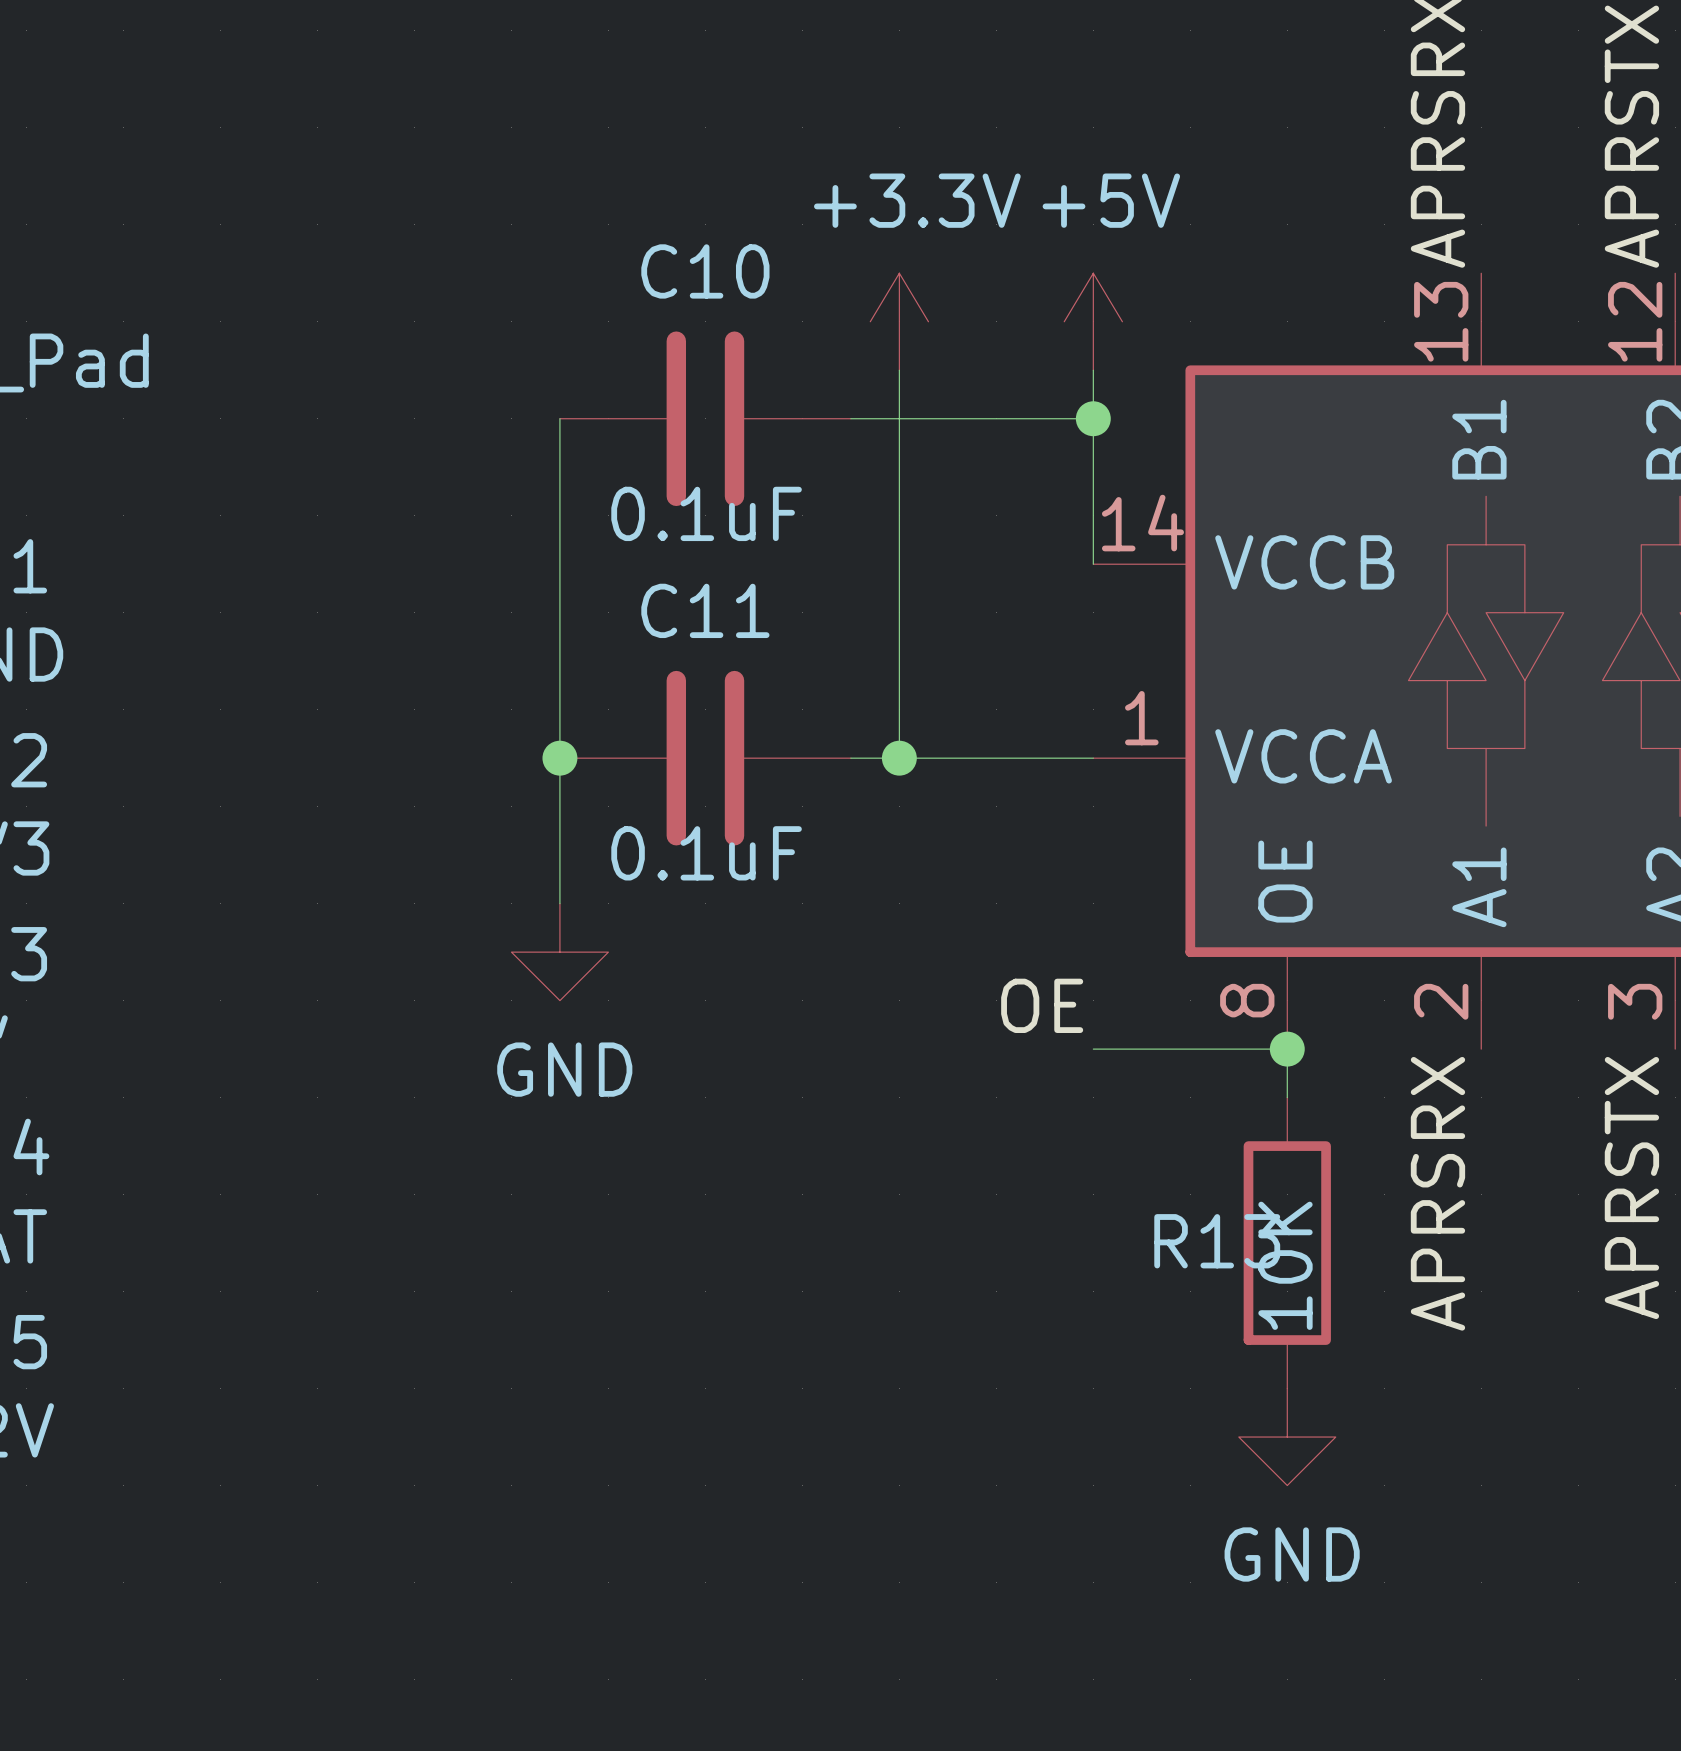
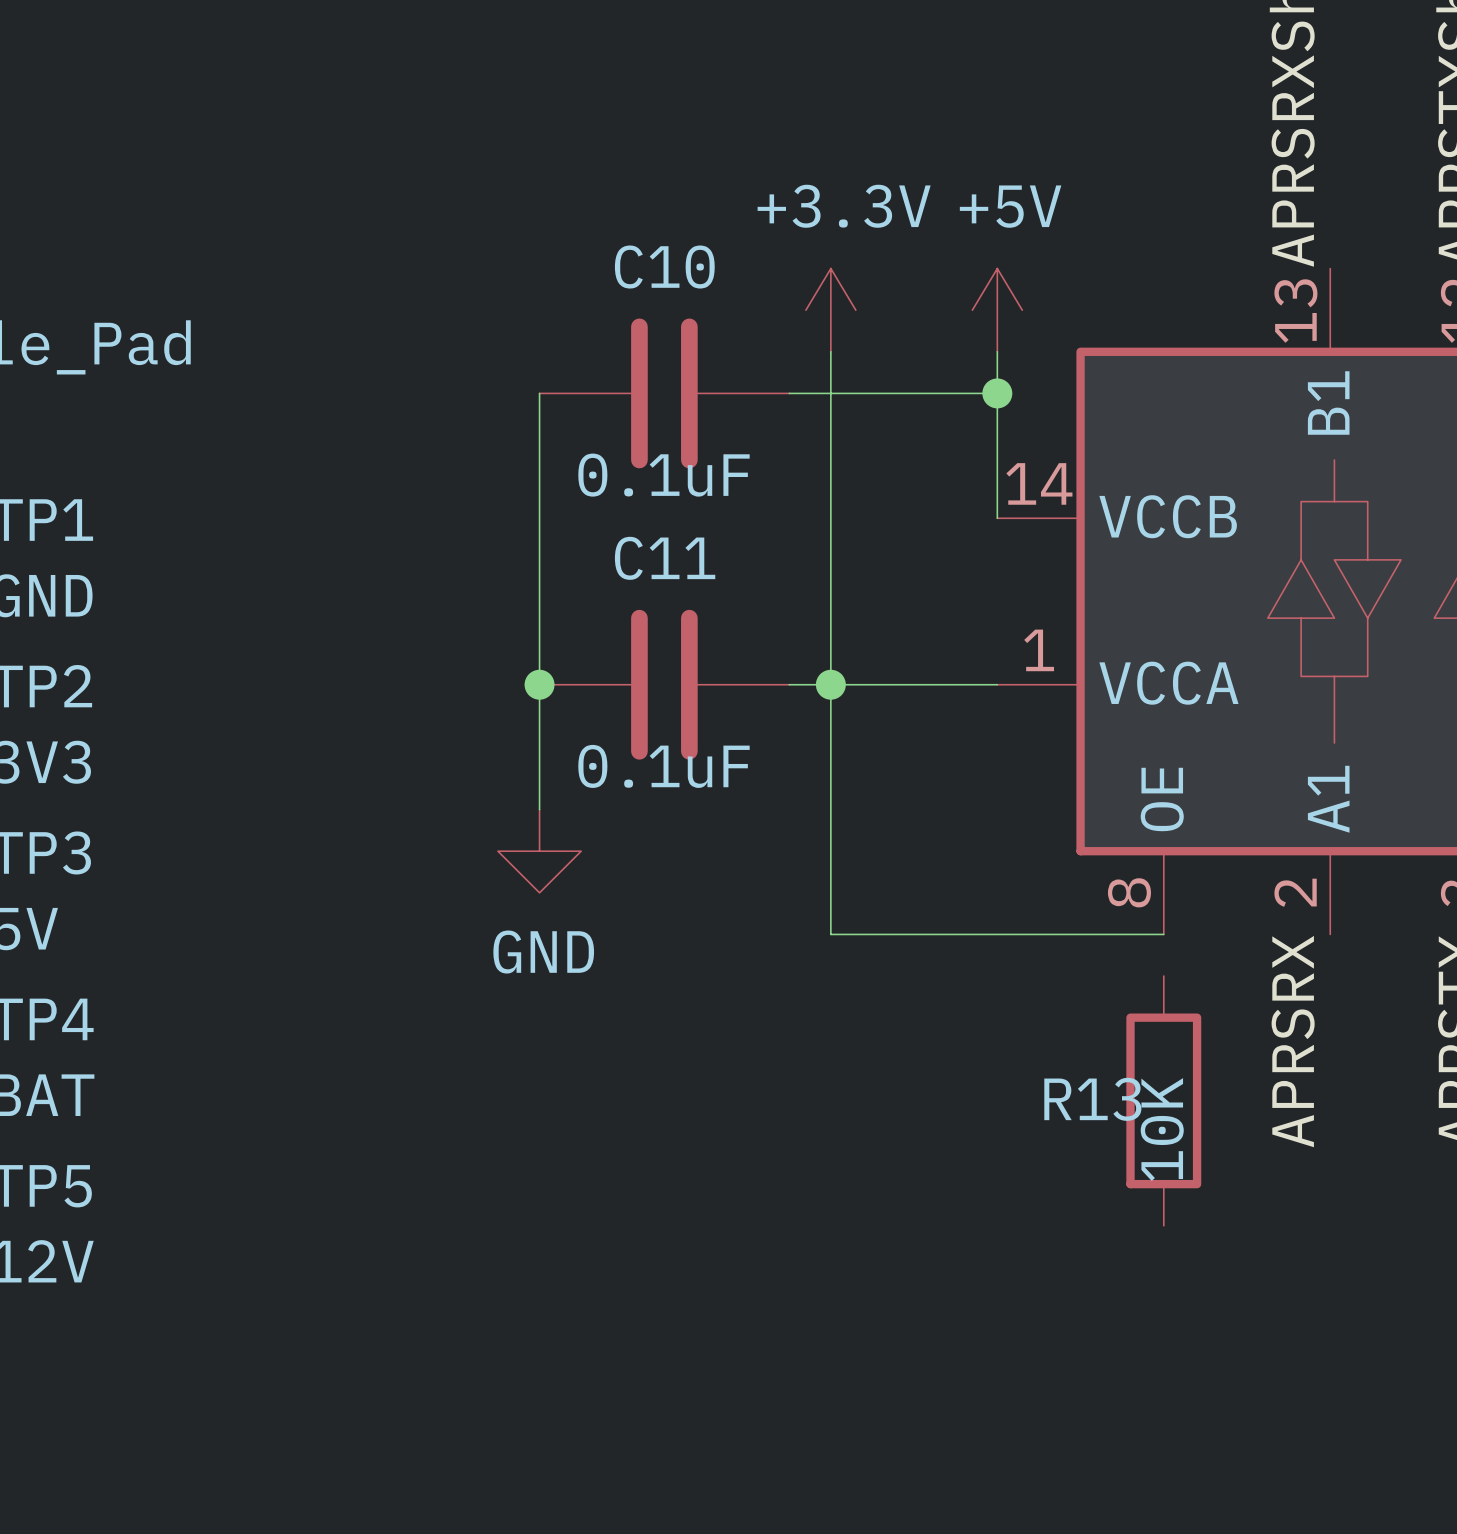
wire: none -> (830, 684) (830, 934) (997, 934)
label: OE (1042, 1005) -> none
wire: (1287, 1049) (1287, 1097) -> none
junction: (1287, 1049) -> none
power symbol: GND (1287, 1437) -> none

